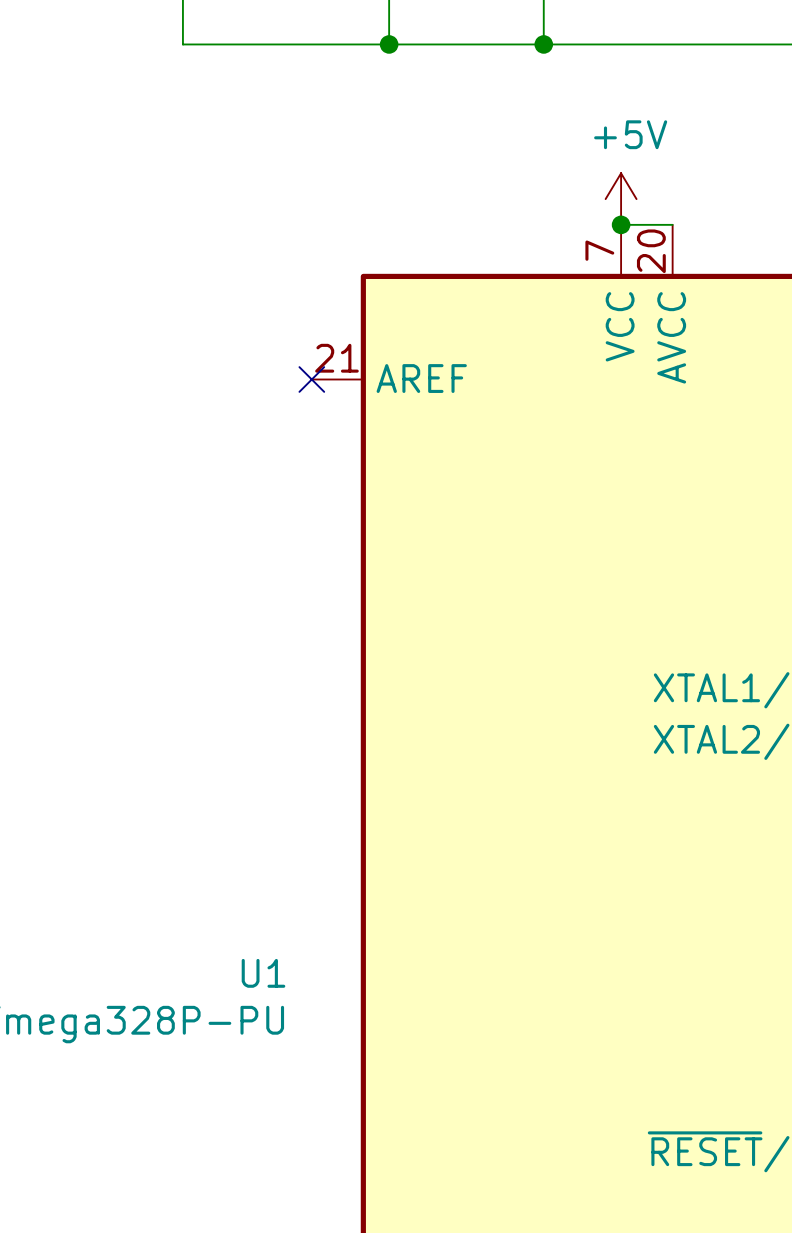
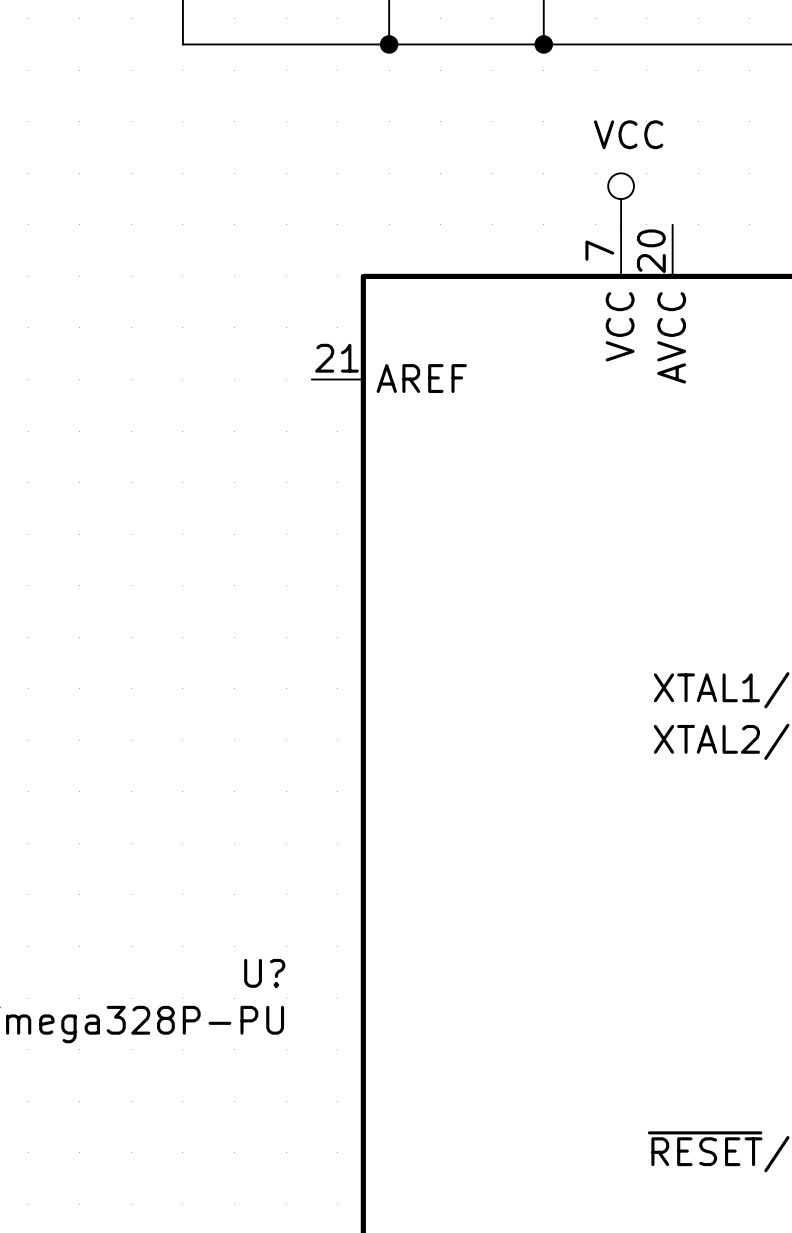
power symbol: +5V (621, 199) -> VCC (621, 199)
wire: (621, 224) (672, 224) -> none
junction: (621, 224) -> none
no-connect mark: (311, 379) -> none
U1 name: U1 (263, 973) -> U? (264, 973)

